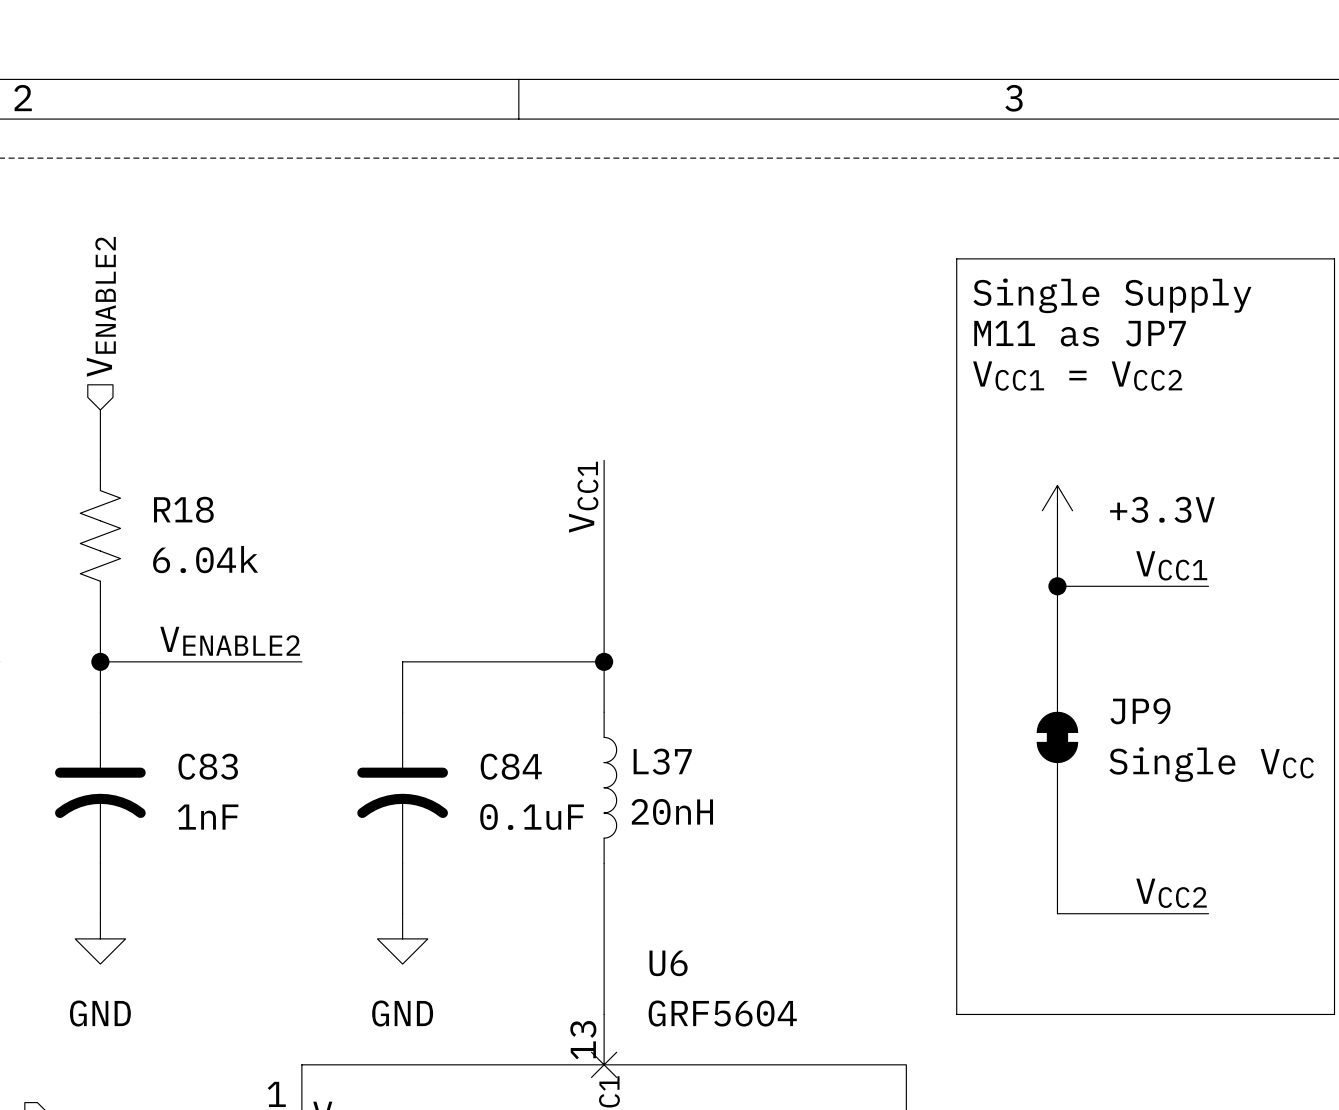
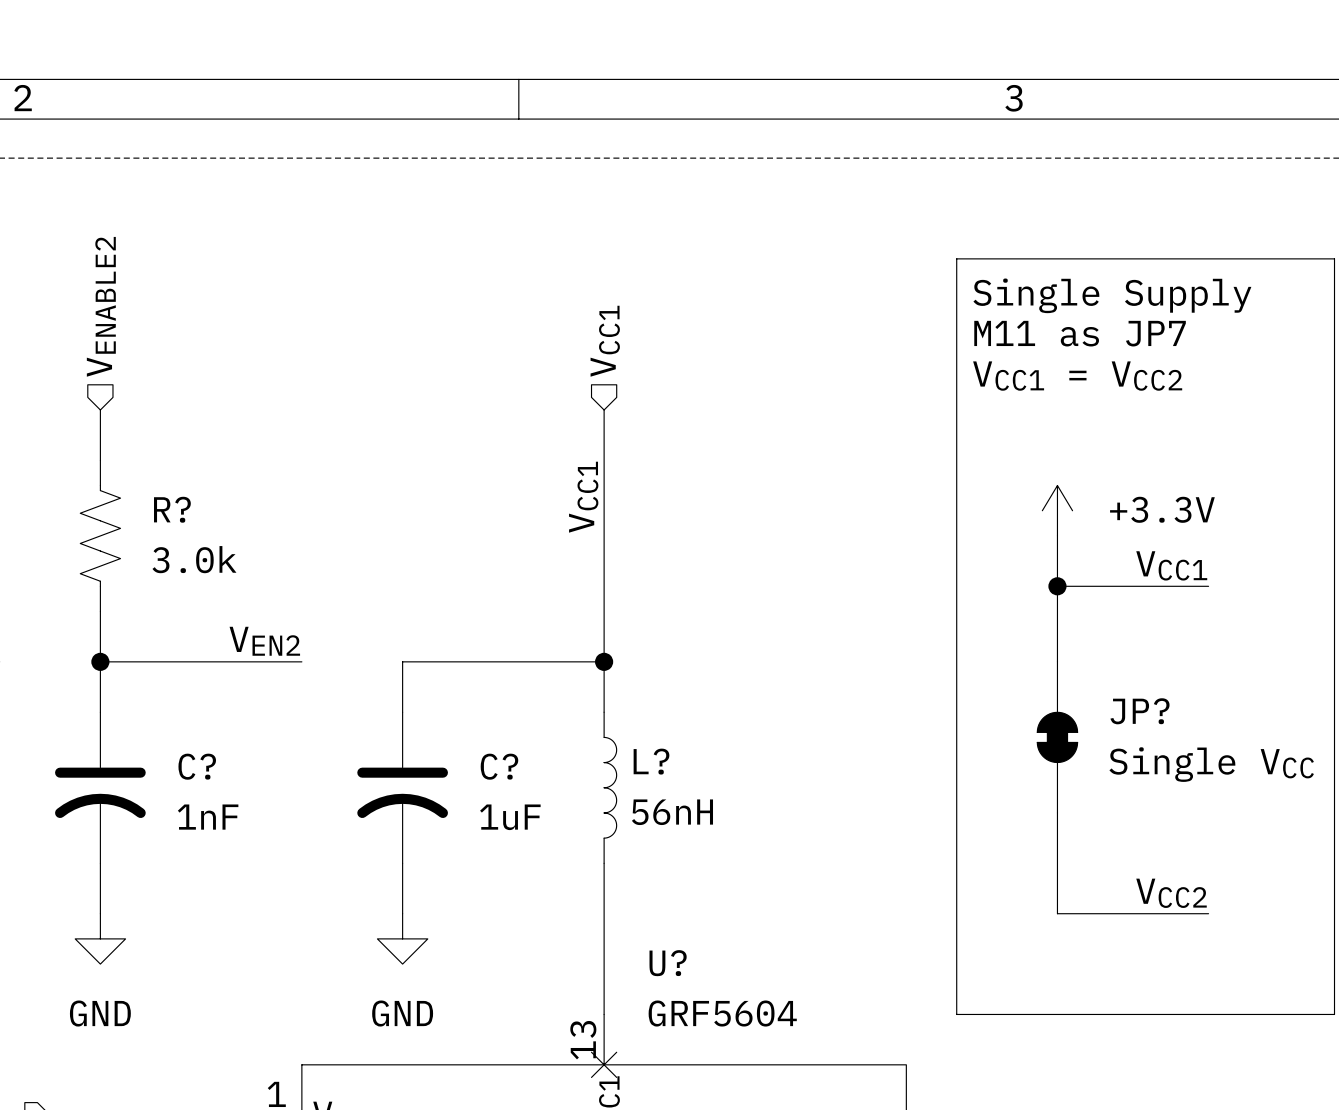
hierarchical label: none -> VCC1 (605, 341)
wire: none -> (604, 409) (604, 460)
R18 name: R18 (183, 509) -> R? (172, 509)
R18 value: 6.04k (205, 559) -> 3.0k (194, 559)
label: VENABLE2 (230, 641) -> VEN2 (264, 641)
JP9 name: JP9 (1140, 711) -> JP? (1140, 711)
L37 name: L37 (662, 761) -> L? (651, 761)
C83 name: C83 (208, 766) -> C? (197, 766)
C84 name: C84 (511, 766) -> C? (499, 766)
L37 value: 20nH (672, 812) -> 56nH (672, 812)
C84 value: 0.1uF (532, 817) -> 1uF (510, 817)
U6 name: U6 (668, 963) -> U? (668, 963)

